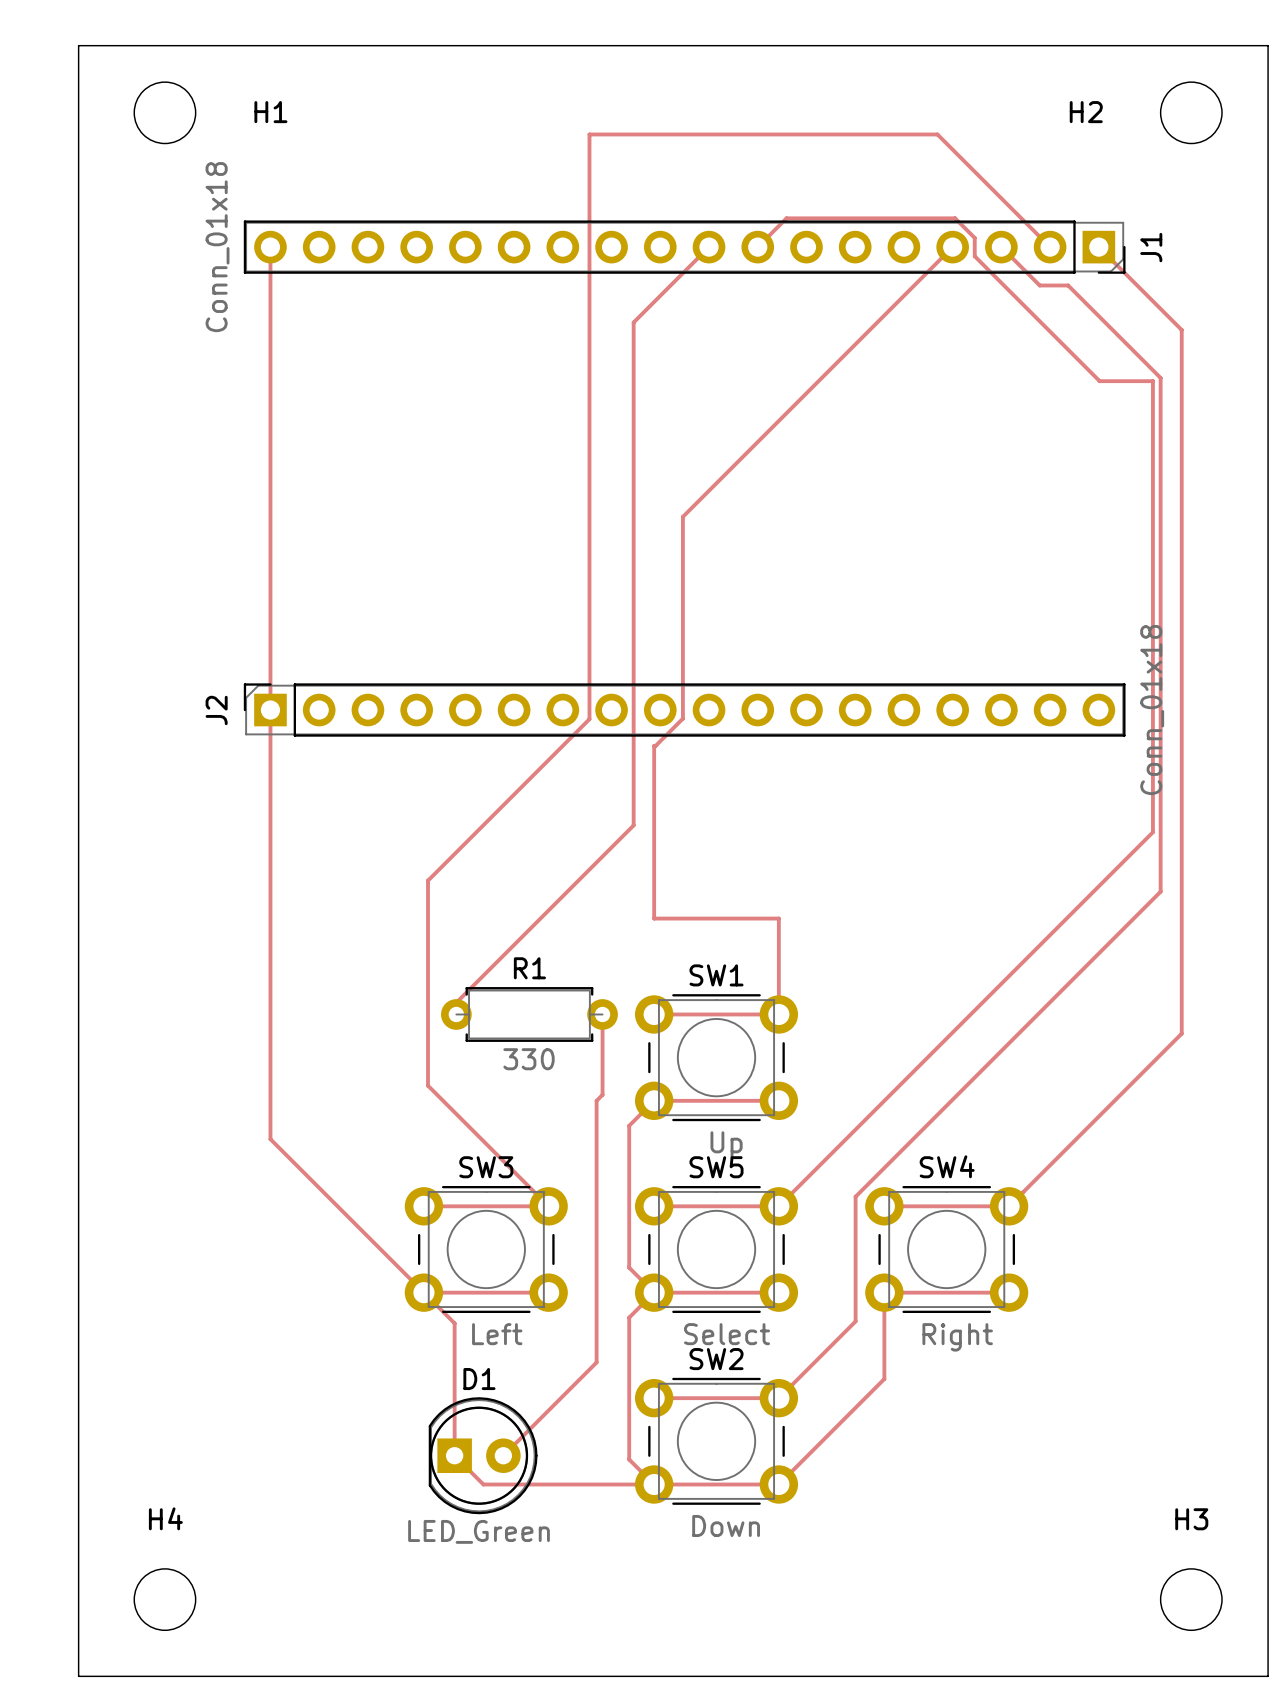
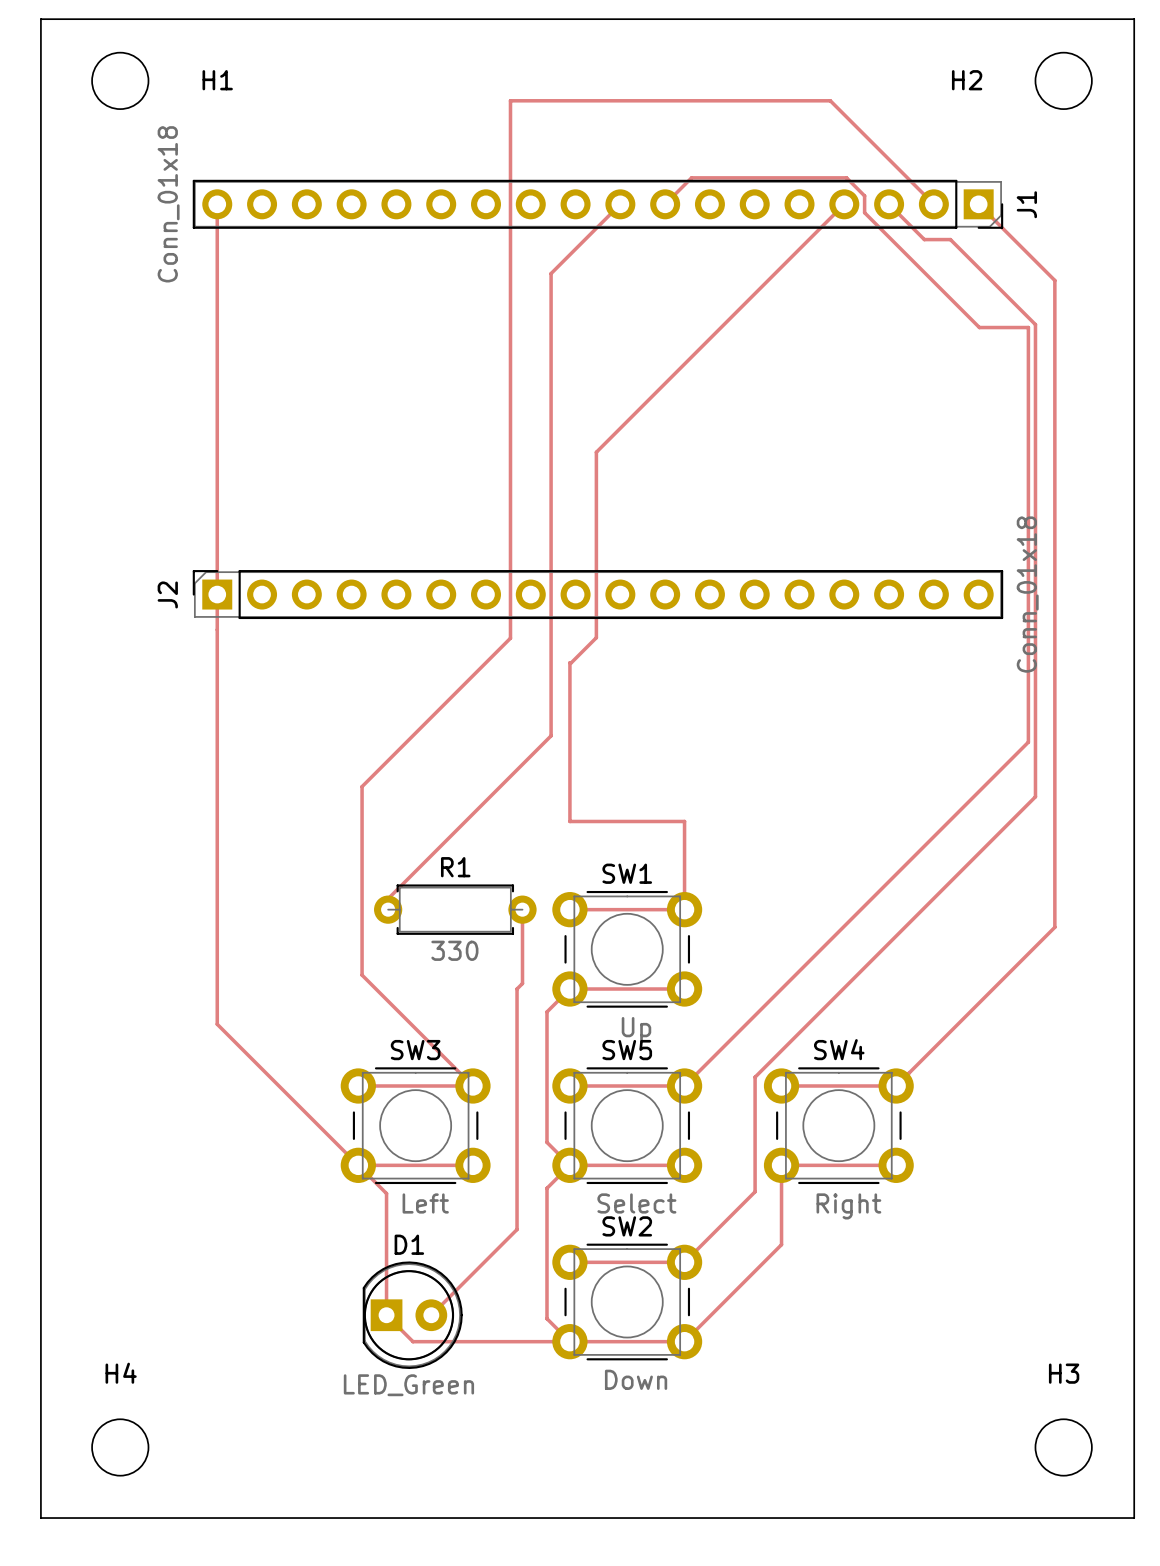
J2 position: (684, 710) -> (597, 594)

